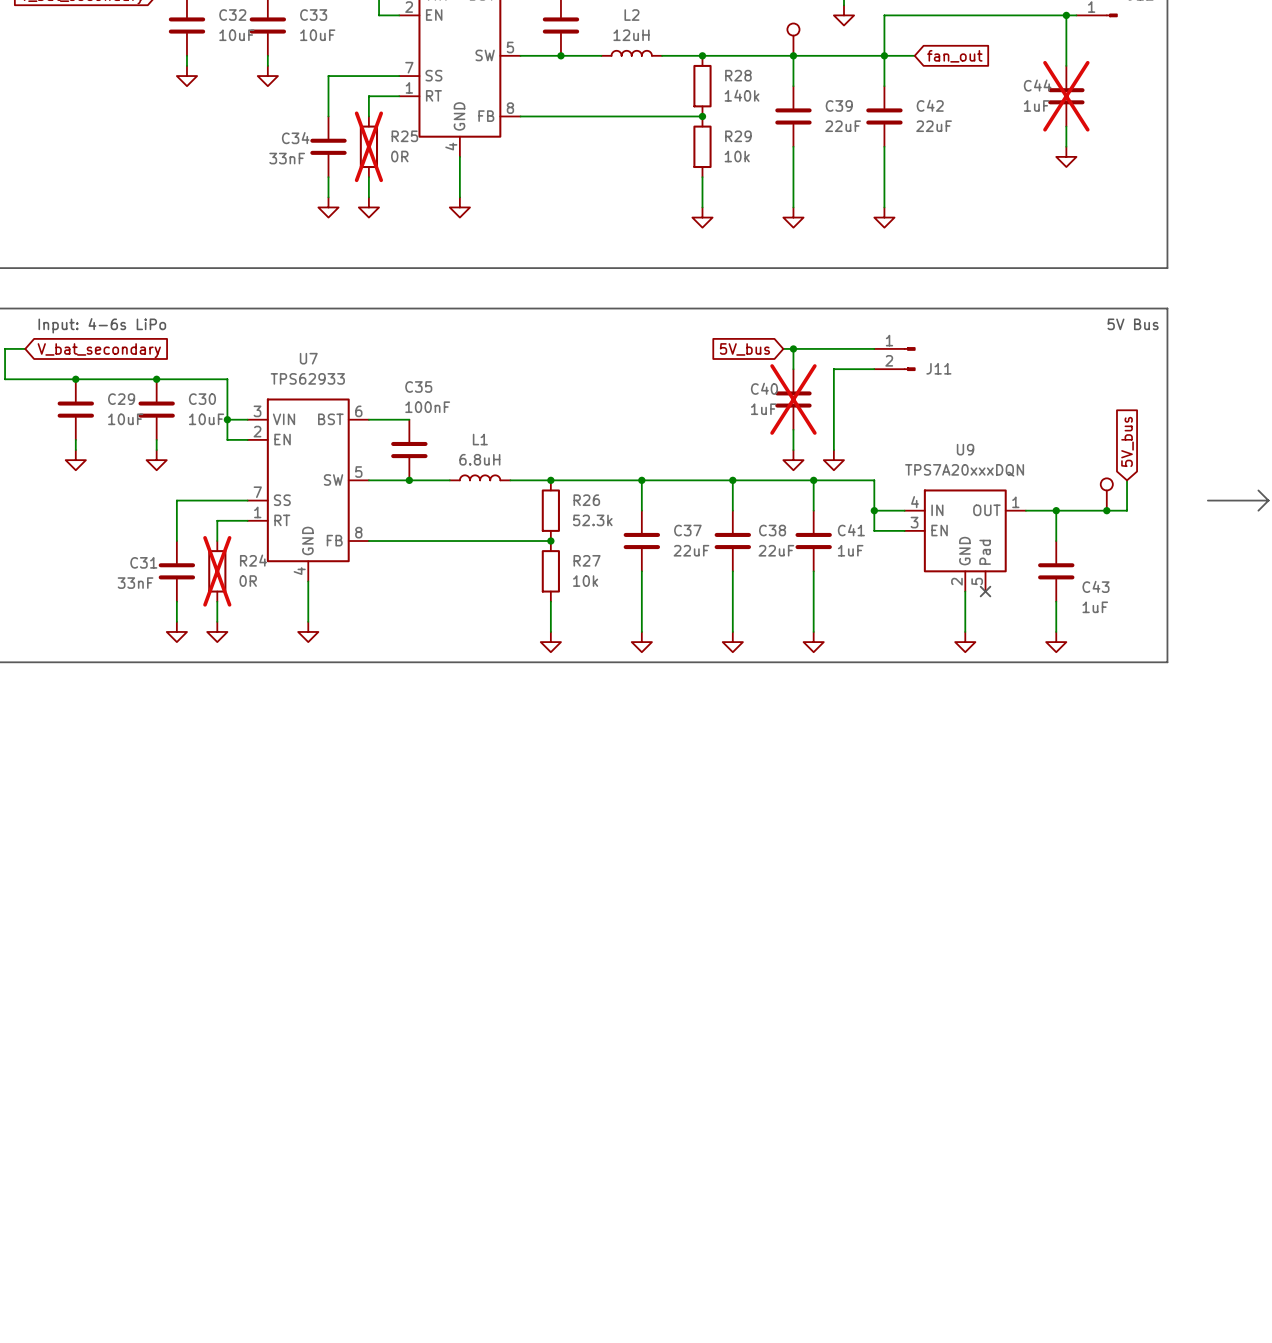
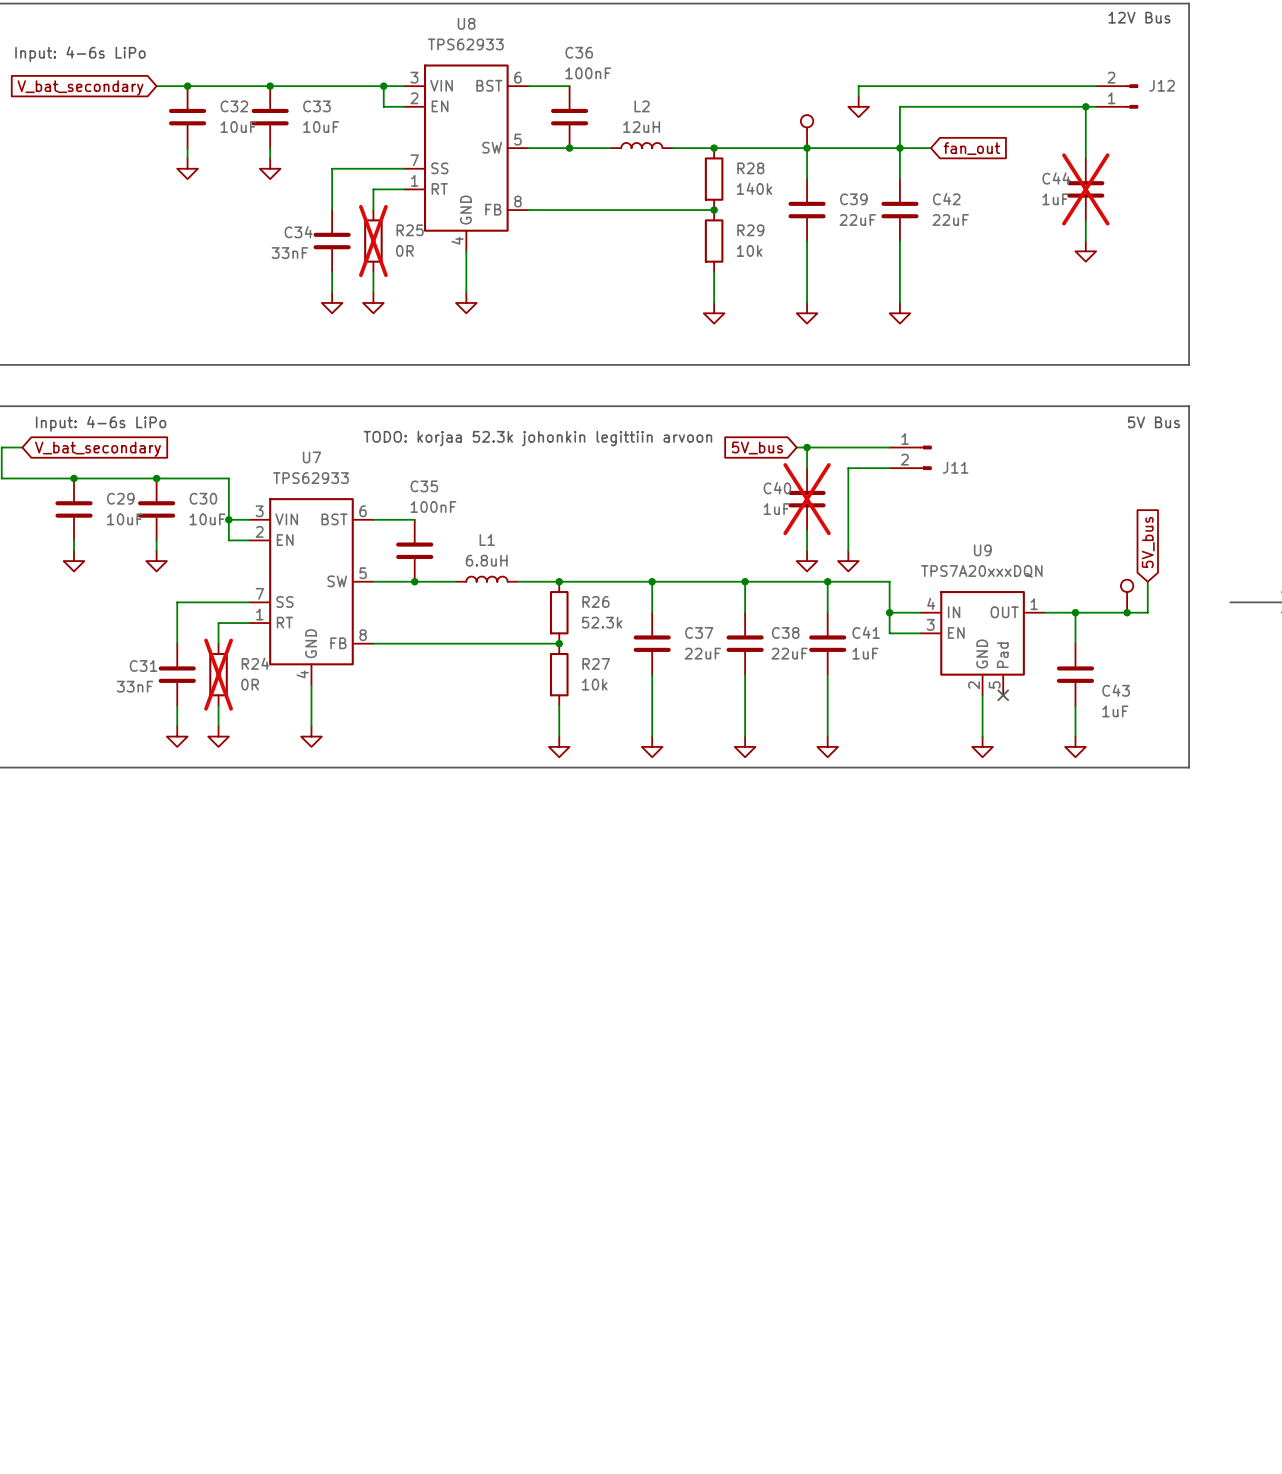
text: none -> TODO: korjaa 52.3k johonkin legittiin arvoon (537, 438)

